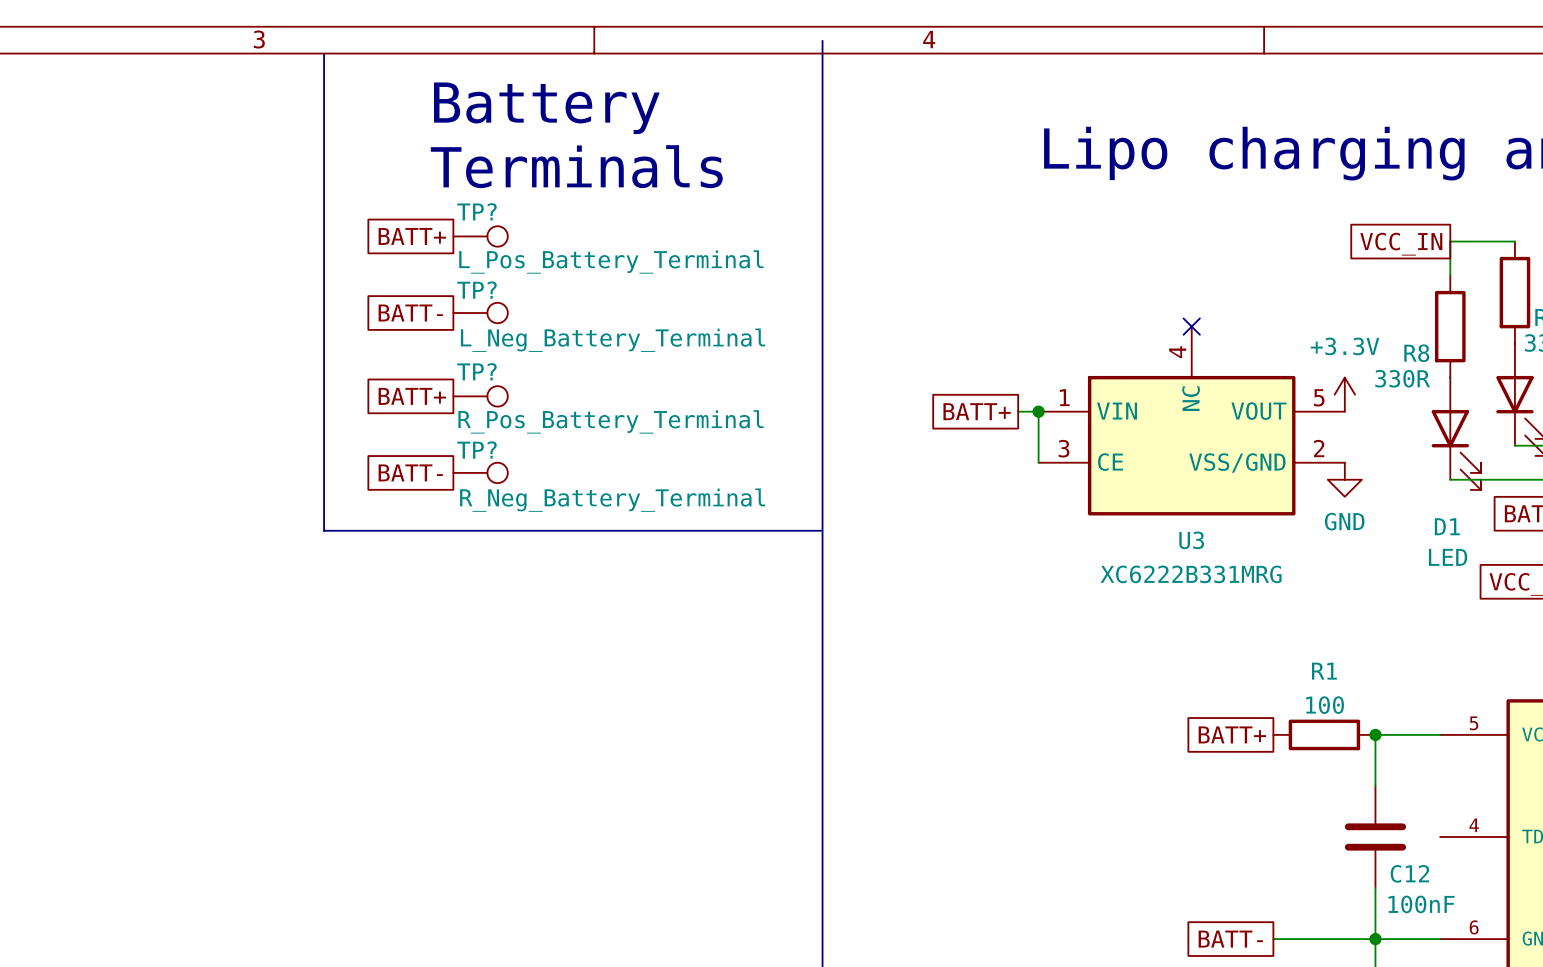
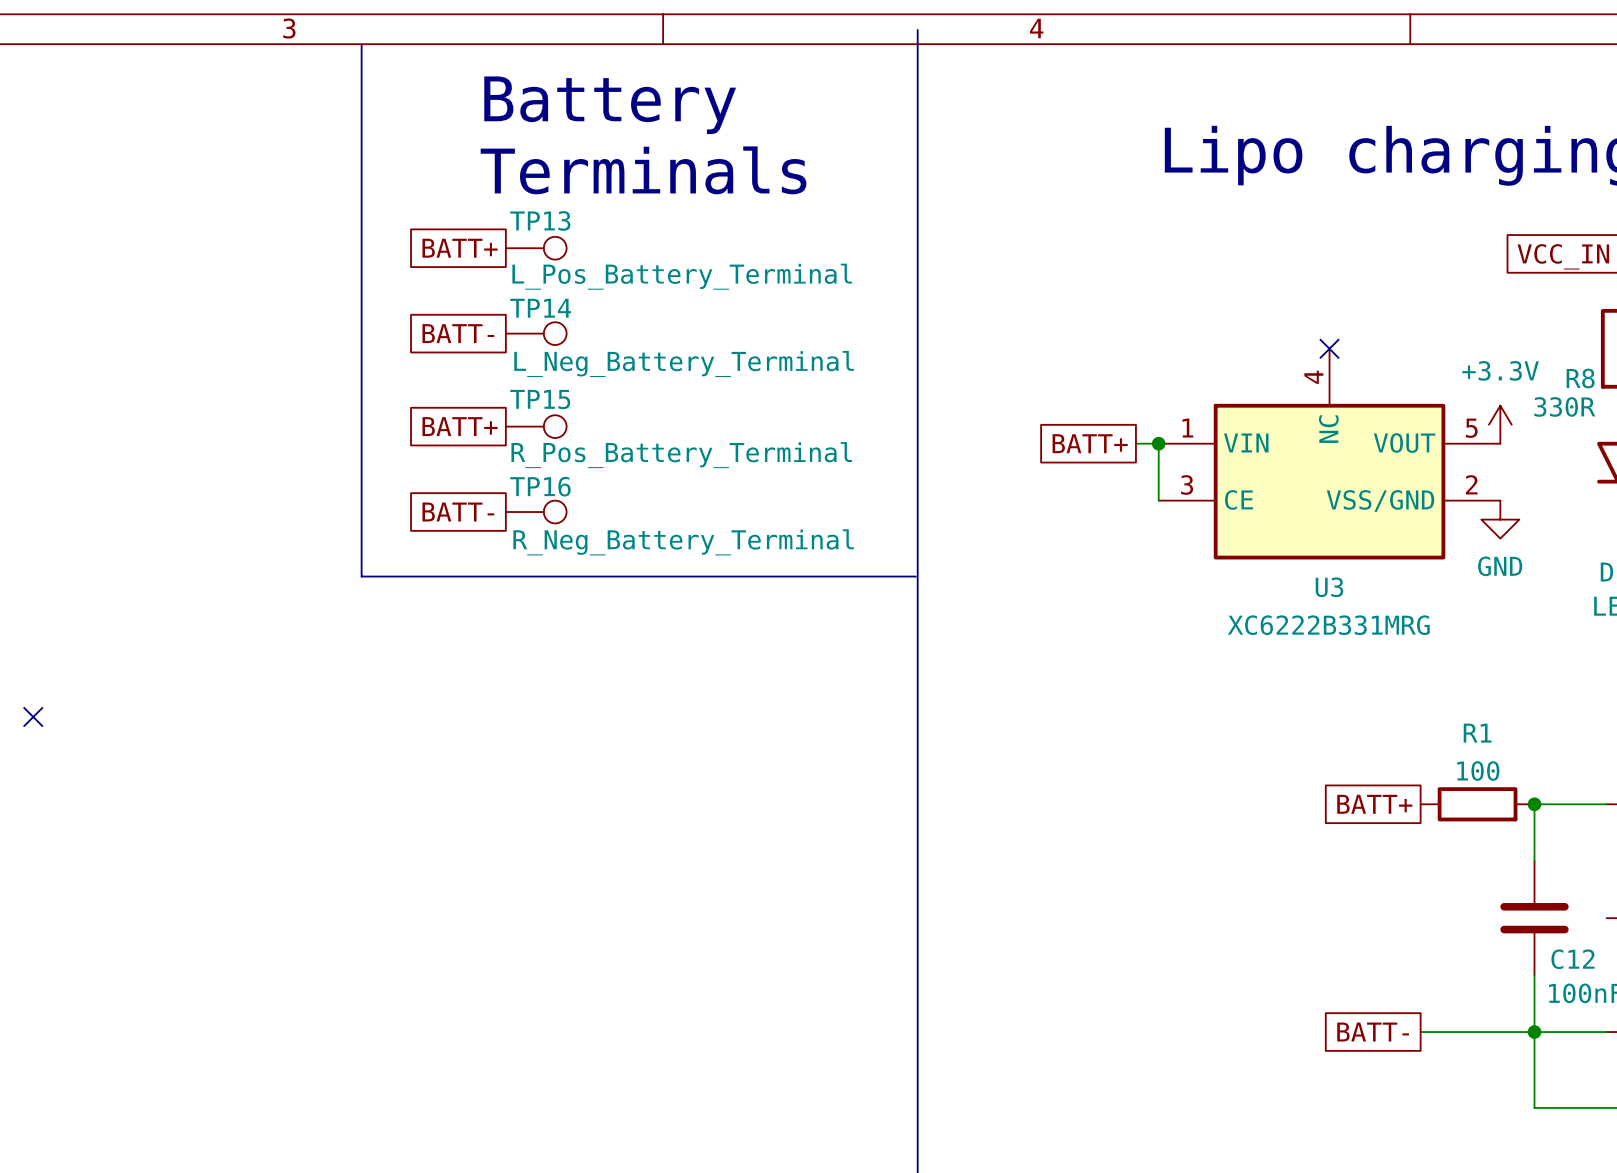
TP? name: TP? (477, 211) -> TP13 (540, 220)
TP? name: TP? (477, 290) -> TP14 (540, 308)
TP? name: TP? (477, 371) -> TP15 (540, 399)
TP? name: TP? (477, 450) -> TP16 (540, 486)
no-connect mark: none -> (33, 716)

